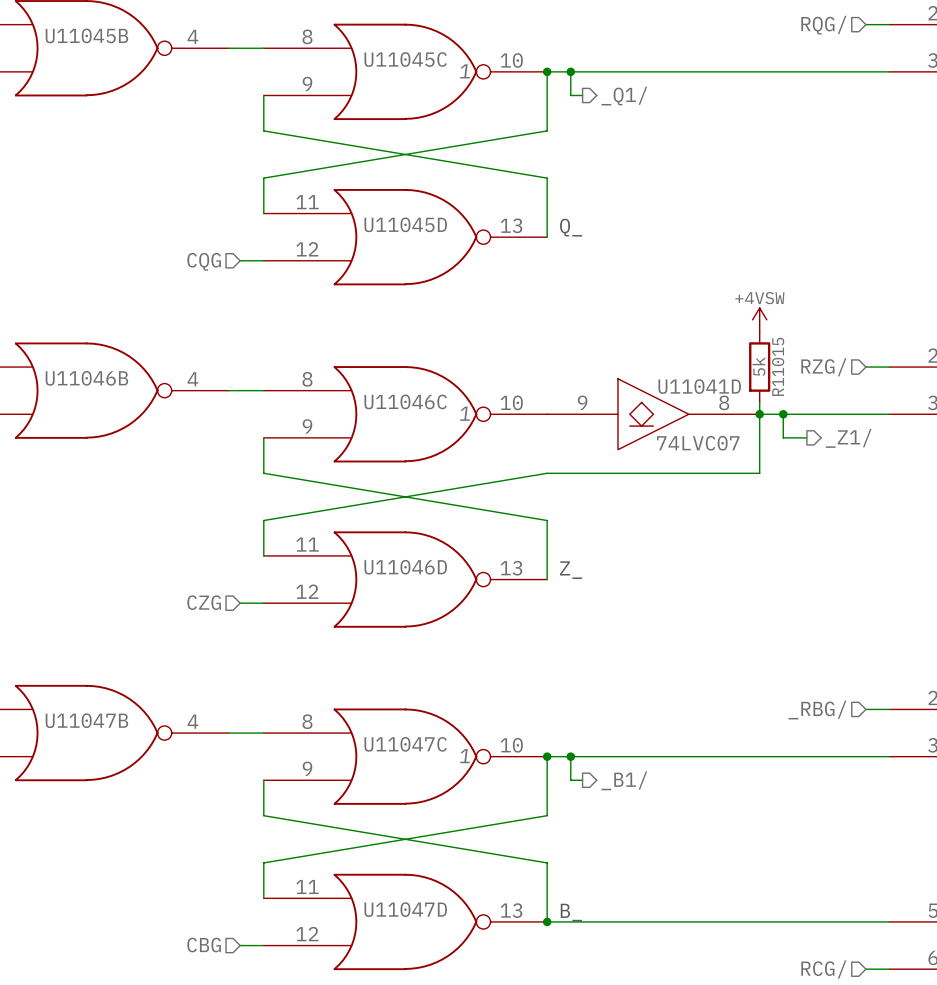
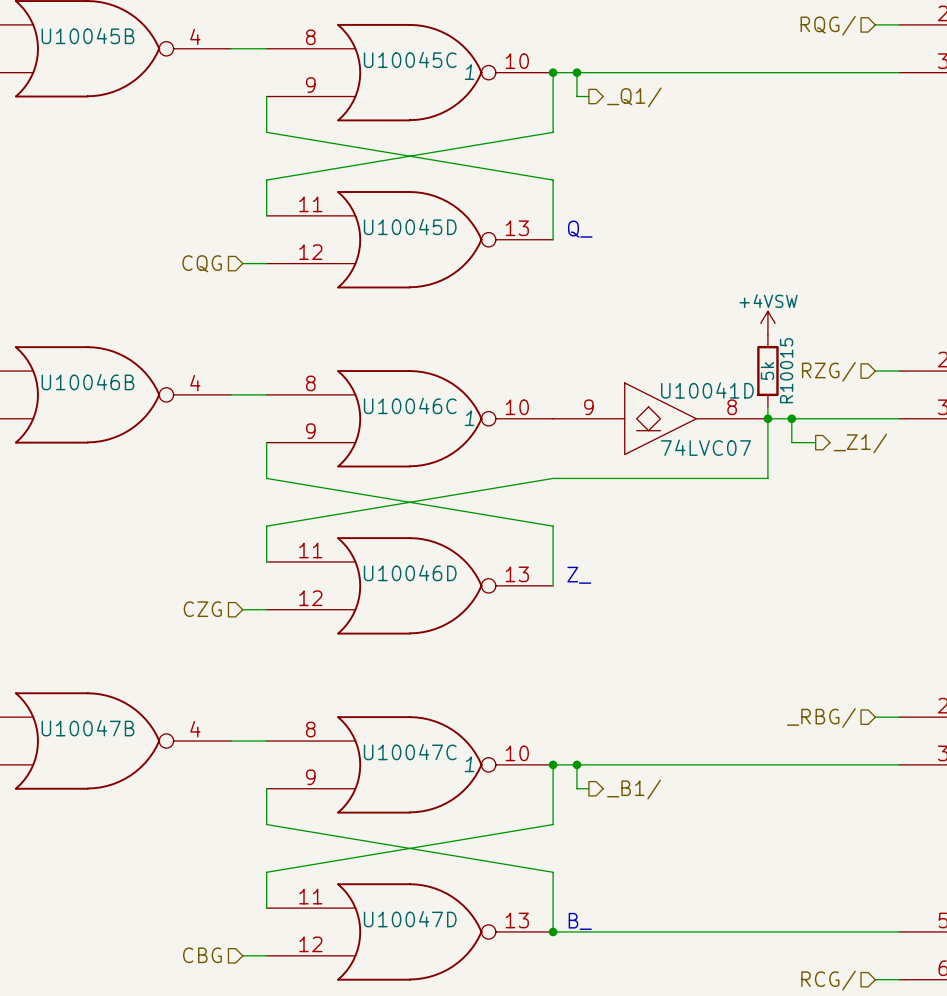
U11045B name: U11045B (86, 35) -> U10045B (87, 35)
U11045C name: U11045C (405, 59) -> U10045C (410, 59)
U11045D name: U11045D (405, 224) -> U10045D (410, 226)
R11015 name: R11015 (778, 366) -> R10015 (786, 370)
U11046B name: U11046B (86, 378) -> U10046B (87, 382)
U11041D name: U11041D (699, 386) -> U10041D (707, 390)
U11046C name: U11046C (405, 401) -> U10046C (410, 405)
U11046D name: U11046D (405, 567) -> U10046D (410, 573)
U11047B name: U11047B (86, 720) -> U10047B (87, 728)
U11047C name: U11047C (405, 744) -> U10047C (410, 752)
U11047D name: U11047D (405, 909) -> U10047D (410, 919)

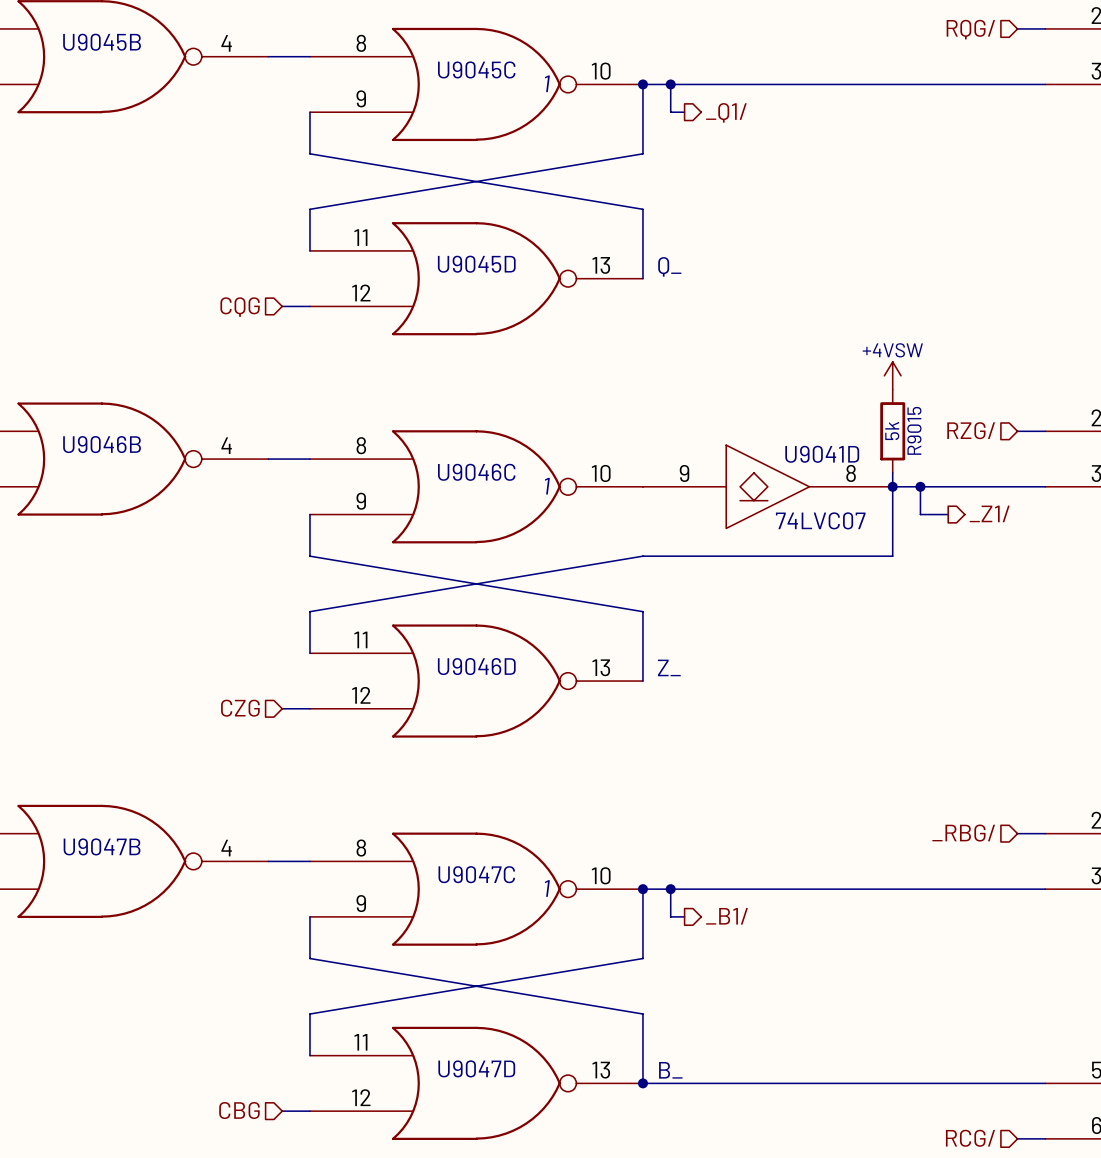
U10045B name: U10045B (87, 35) -> U9045B (102, 42)
U10045C name: U10045C (410, 59) -> U9045C (476, 69)
U10045D name: U10045D (410, 226) -> U9045D (476, 264)
R10015 name: R10015 (786, 370) -> R9015 (914, 430)
U10046B name: U10046B (87, 382) -> U9046B (102, 444)
U10041D name: U10041D (707, 390) -> U9041D (822, 454)
U10046C name: U10046C (410, 405) -> U9046C (476, 472)
U10046D name: U10046D (410, 573) -> U9046D (476, 666)
U10047B name: U10047B (87, 728) -> U9047B (102, 846)
U10047C name: U10047C (410, 752) -> U9047C (476, 874)
U10047D name: U10047D (410, 919) -> U9047D (476, 1068)

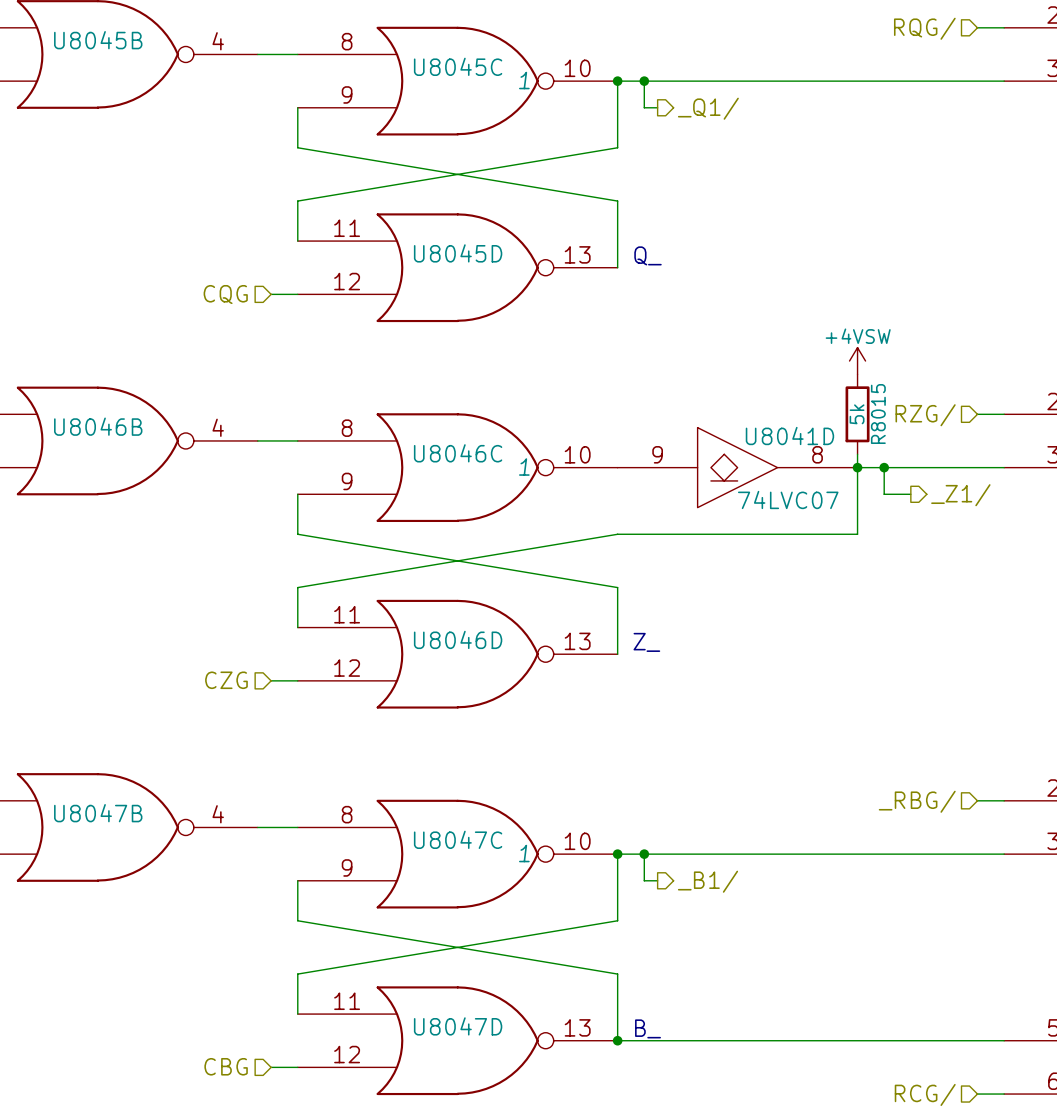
U9045B name: U9045B (102, 42) -> U8045B (98, 40)
U9045C name: U9045C (476, 69) -> U8045C (458, 66)
U9045D name: U9045D (476, 264) -> U8045D (458, 253)
R9015 name: R9015 (914, 430) -> R8015 (878, 414)
U9046B name: U9046B (102, 444) -> U8046B (98, 426)
U9041D name: U9041D (822, 454) -> U8041D (789, 436)
U9046C name: U9046C (476, 472) -> U8046C (458, 453)
U9046D name: U9046D (476, 666) -> U8046D (458, 639)
U9047B name: U9047B (102, 846) -> U8047B (98, 813)
U9047C name: U9047C (476, 874) -> U8047C (458, 839)
U9047D name: U9047D (476, 1068) -> U8047D (458, 1026)

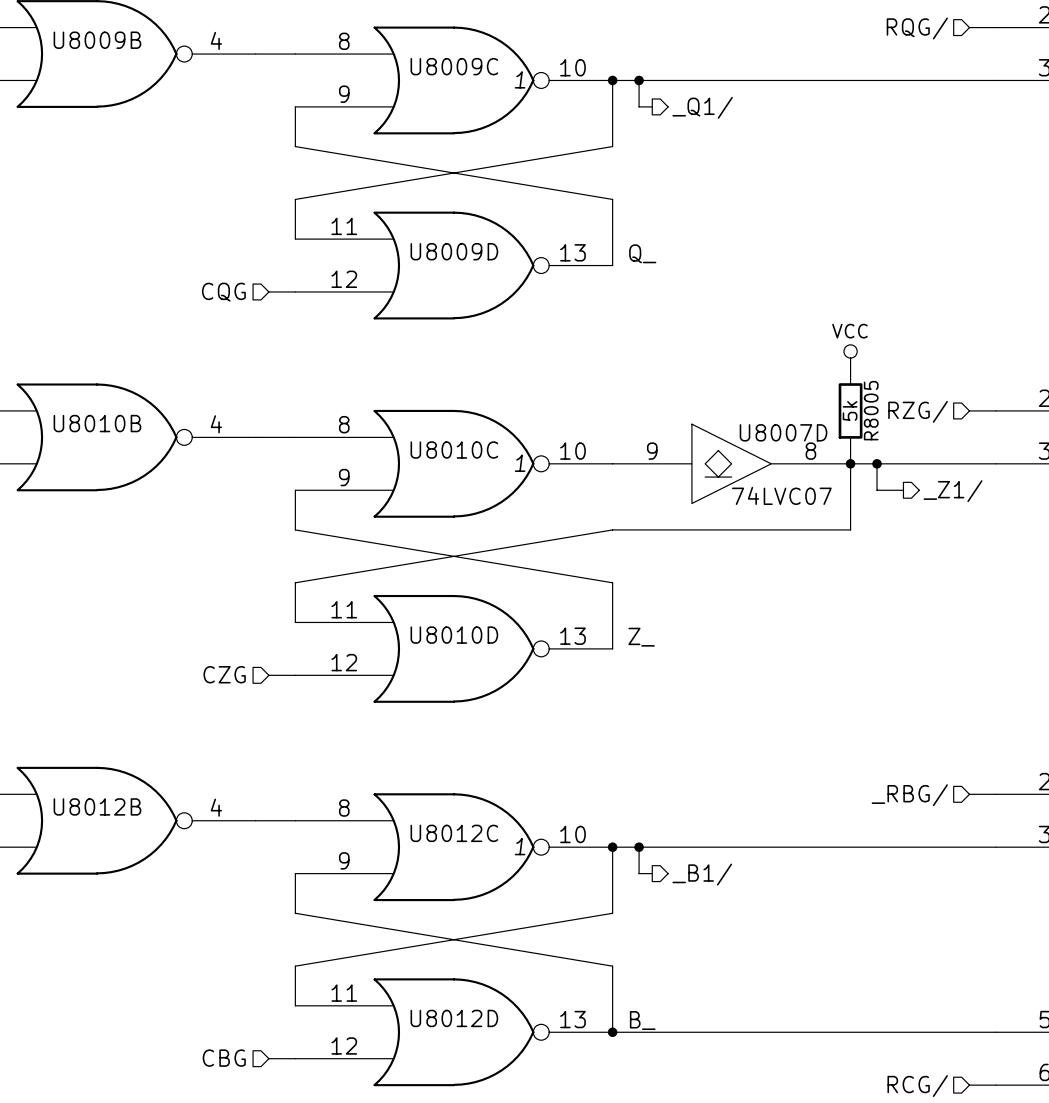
U8045B name: U8045B (98, 40) -> U8009B (97, 40)
U8045C name: U8045C (458, 66) -> U8009C (454, 66)
U8045D name: U8045D (458, 253) -> U8009D (454, 251)
power symbol: +4VSW (857, 361) -> VCC (850, 358)
R8015 name: R8015 (878, 414) -> R8005 (871, 410)
U8046B name: U8046B (98, 426) -> U8010B (97, 423)
U8041D name: U8041D (789, 436) -> U8007D (783, 432)
U8046C name: U8046C (458, 453) -> U8010C (454, 450)
U8046D name: U8046D (458, 639) -> U8010D (454, 635)
U8047B name: U8047B (98, 813) -> U8012B (97, 806)
U8047C name: U8047C (458, 839) -> U8012C (454, 833)
U8047D name: U8047D (458, 1026) -> U8012D (454, 1018)

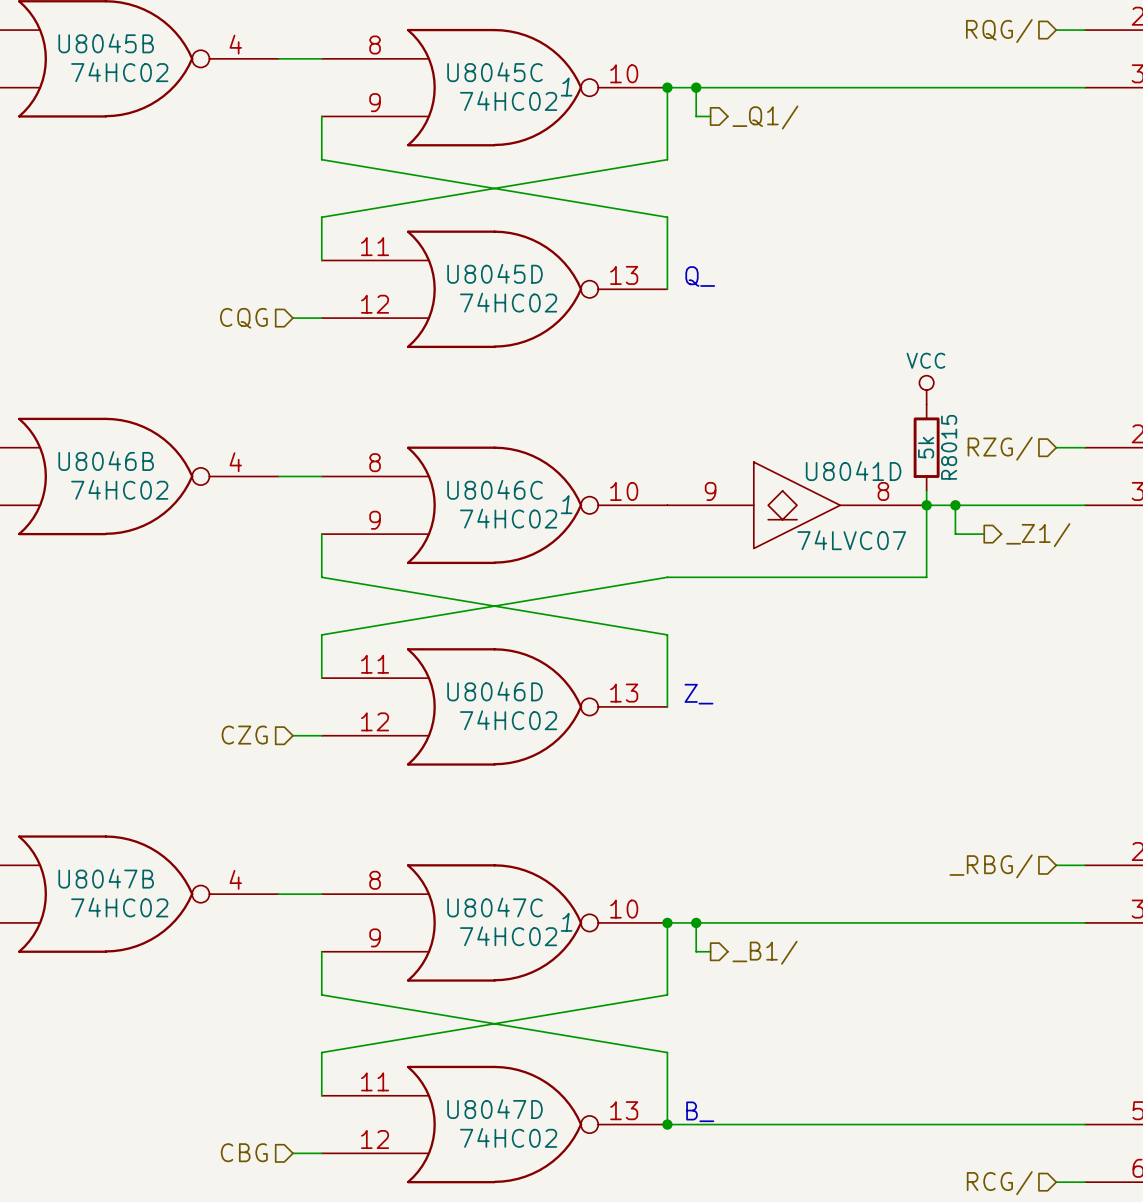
U8009B name: U8009B (97, 40) -> U8045B (106, 43)
U8009B value: none -> 74HC02 (119, 72)
U8009C name: U8009C (454, 66) -> U8045C (495, 72)
U8009C value: none -> 74HC02 (508, 101)
U8009D name: U8009D (454, 251) -> U8045D (495, 273)
U8009D value: none -> 74HC02 (508, 302)
R8005 name: R8005 (871, 410) -> R8015 (949, 447)
U8010B name: U8010B (97, 423) -> U8046B (106, 461)
U8007D name: U8007D (783, 432) -> U8041D (853, 471)
U8010B value: none -> 74HC02 (119, 489)
U8010C name: U8010C (454, 450) -> U8046C (495, 489)
U8010C value: none -> 74HC02 (508, 518)
U8010D name: U8010D (454, 635) -> U8046D (495, 691)
U8010D value: none -> 74HC02 (508, 720)
U8012B name: U8012B (97, 806) -> U8047B (106, 878)
U8012B value: none -> 74HC02 (119, 907)
U8012C name: U8012C (454, 833) -> U8047C (495, 907)
U8012C value: none -> 74HC02 (508, 936)
U8012D name: U8012D (454, 1018) -> U8047D (495, 1109)
U8012D value: none -> 74HC02 (508, 1137)

